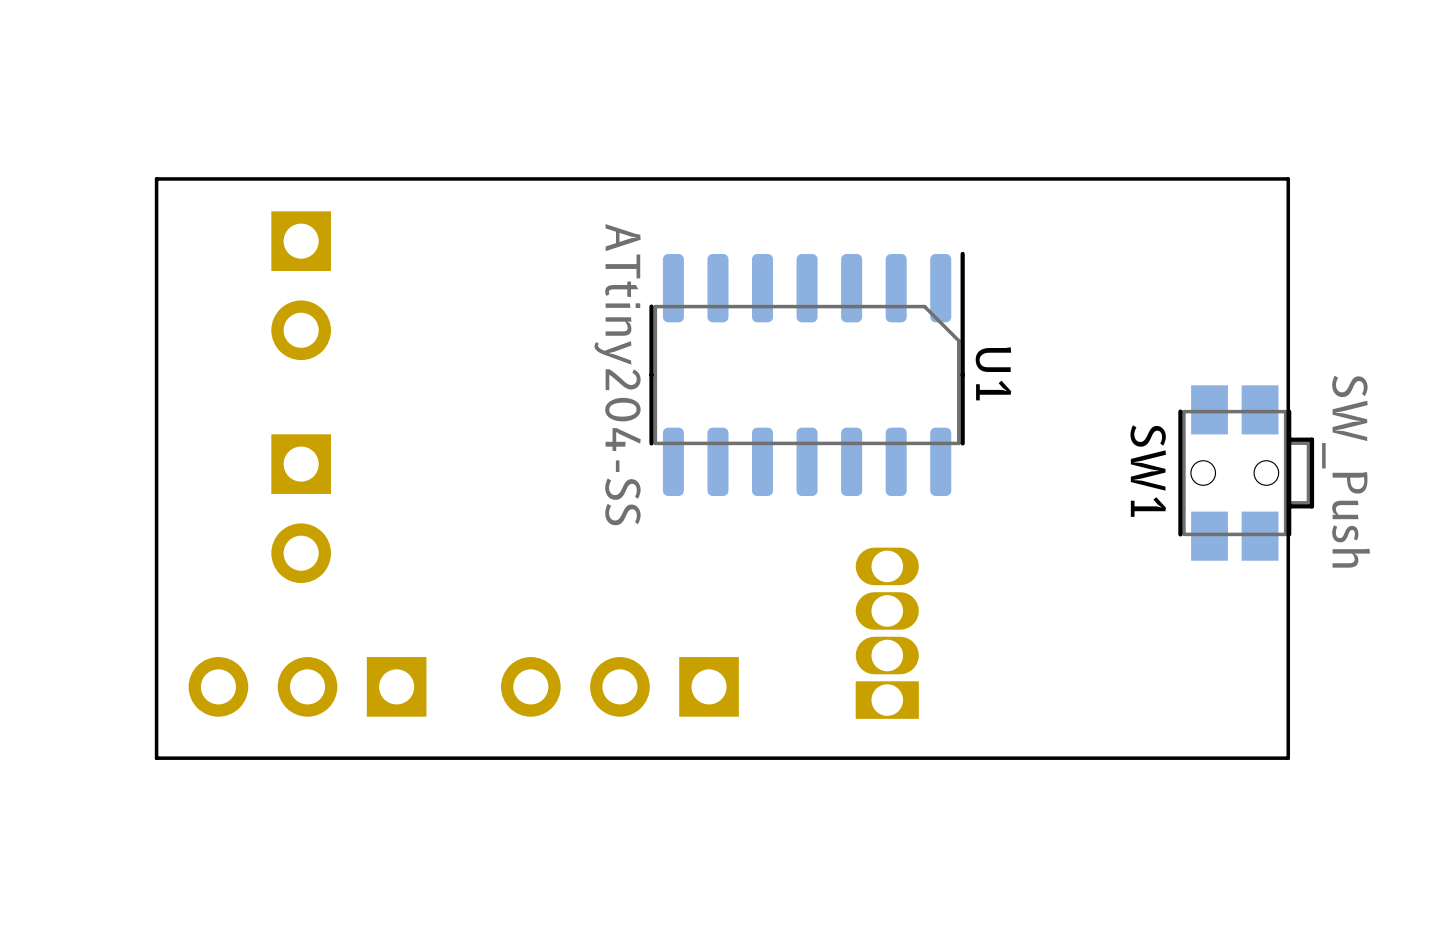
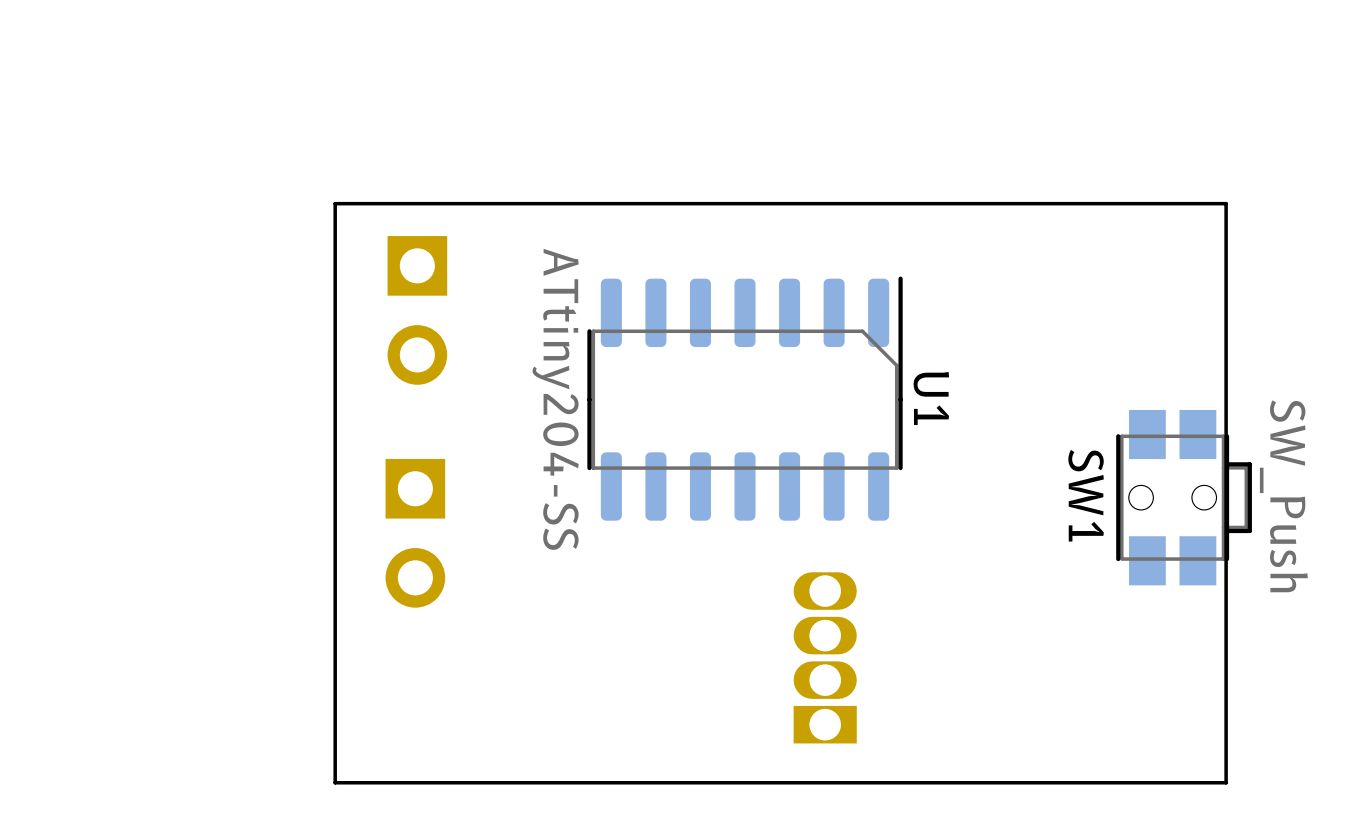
board edge: (397, 178) (156, 178) (156, 758) (397, 758) -> (335, 203) (335, 782)
part: (301, 285) -> none
part: none -> (417, 310)
part: (301, 508) -> none
part: none -> (415, 533)
part: (307, 686) -> none
part: (619, 686) -> none

